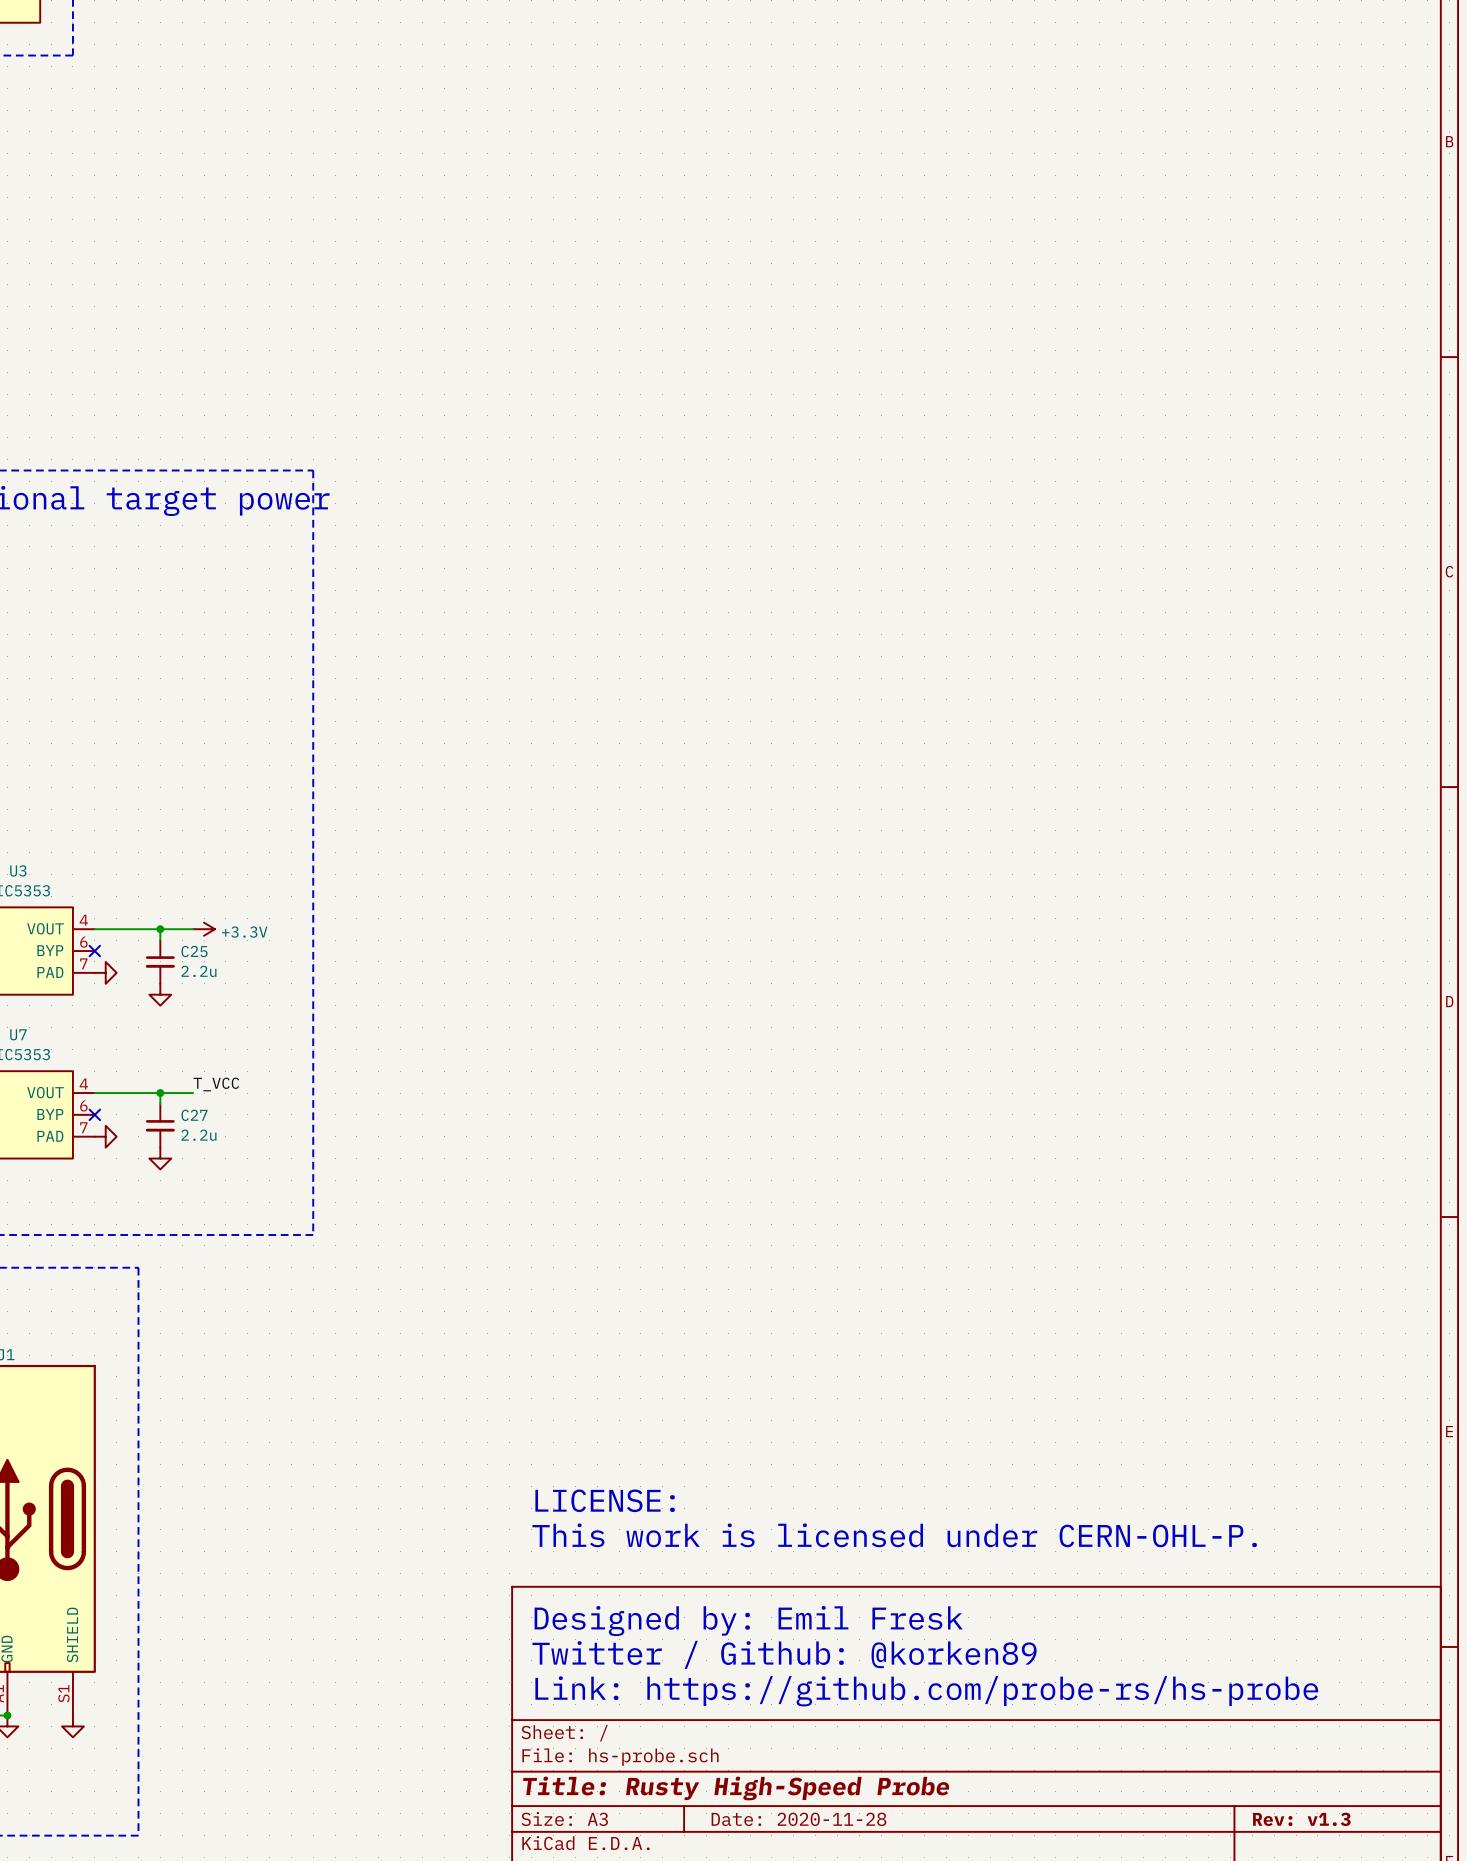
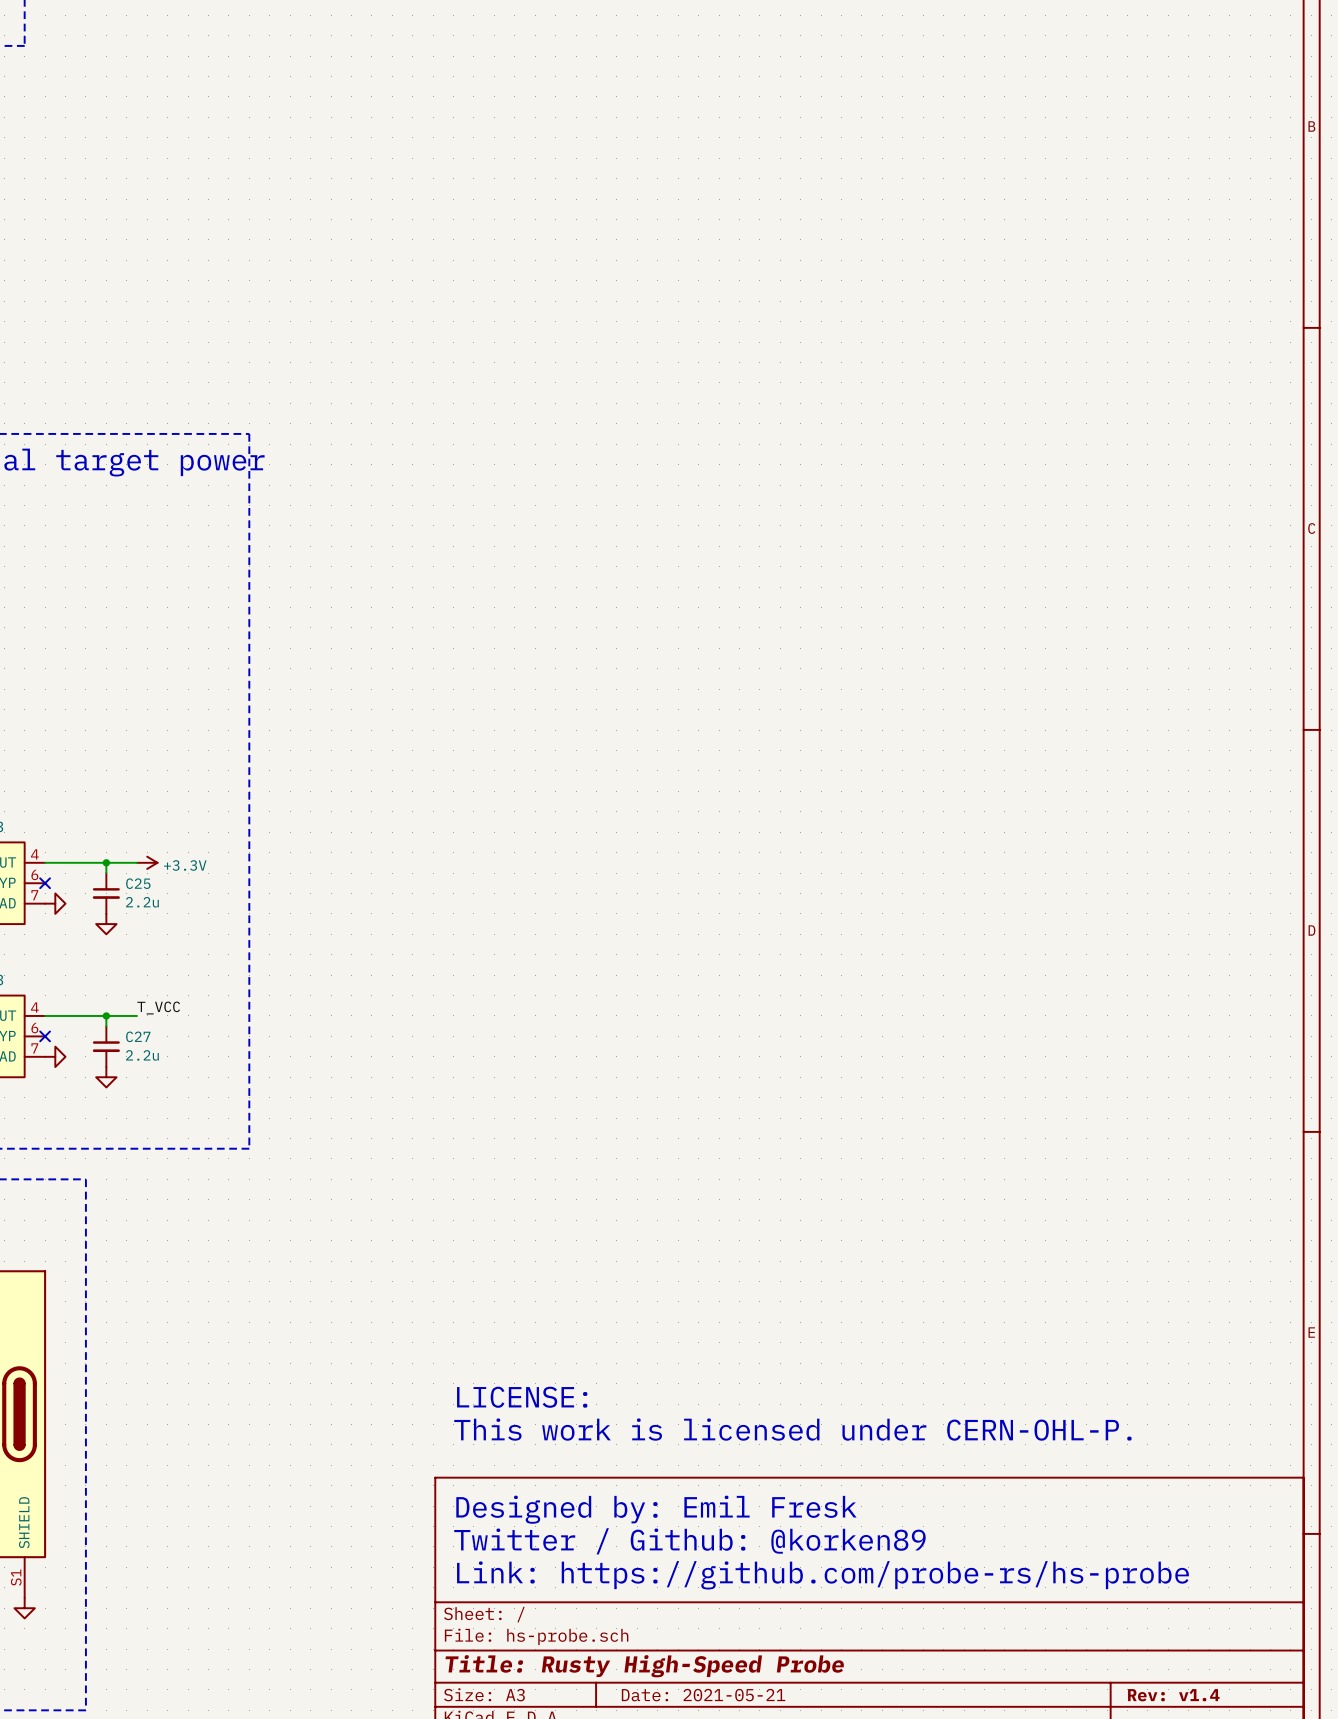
title block: Date: 2020-11-28 (798, 1819) -> Date: 2021-05-21 (703, 1695)
title block: Rev: v1.3 (1301, 1819) -> Rev: v1.4 (1173, 1695)

